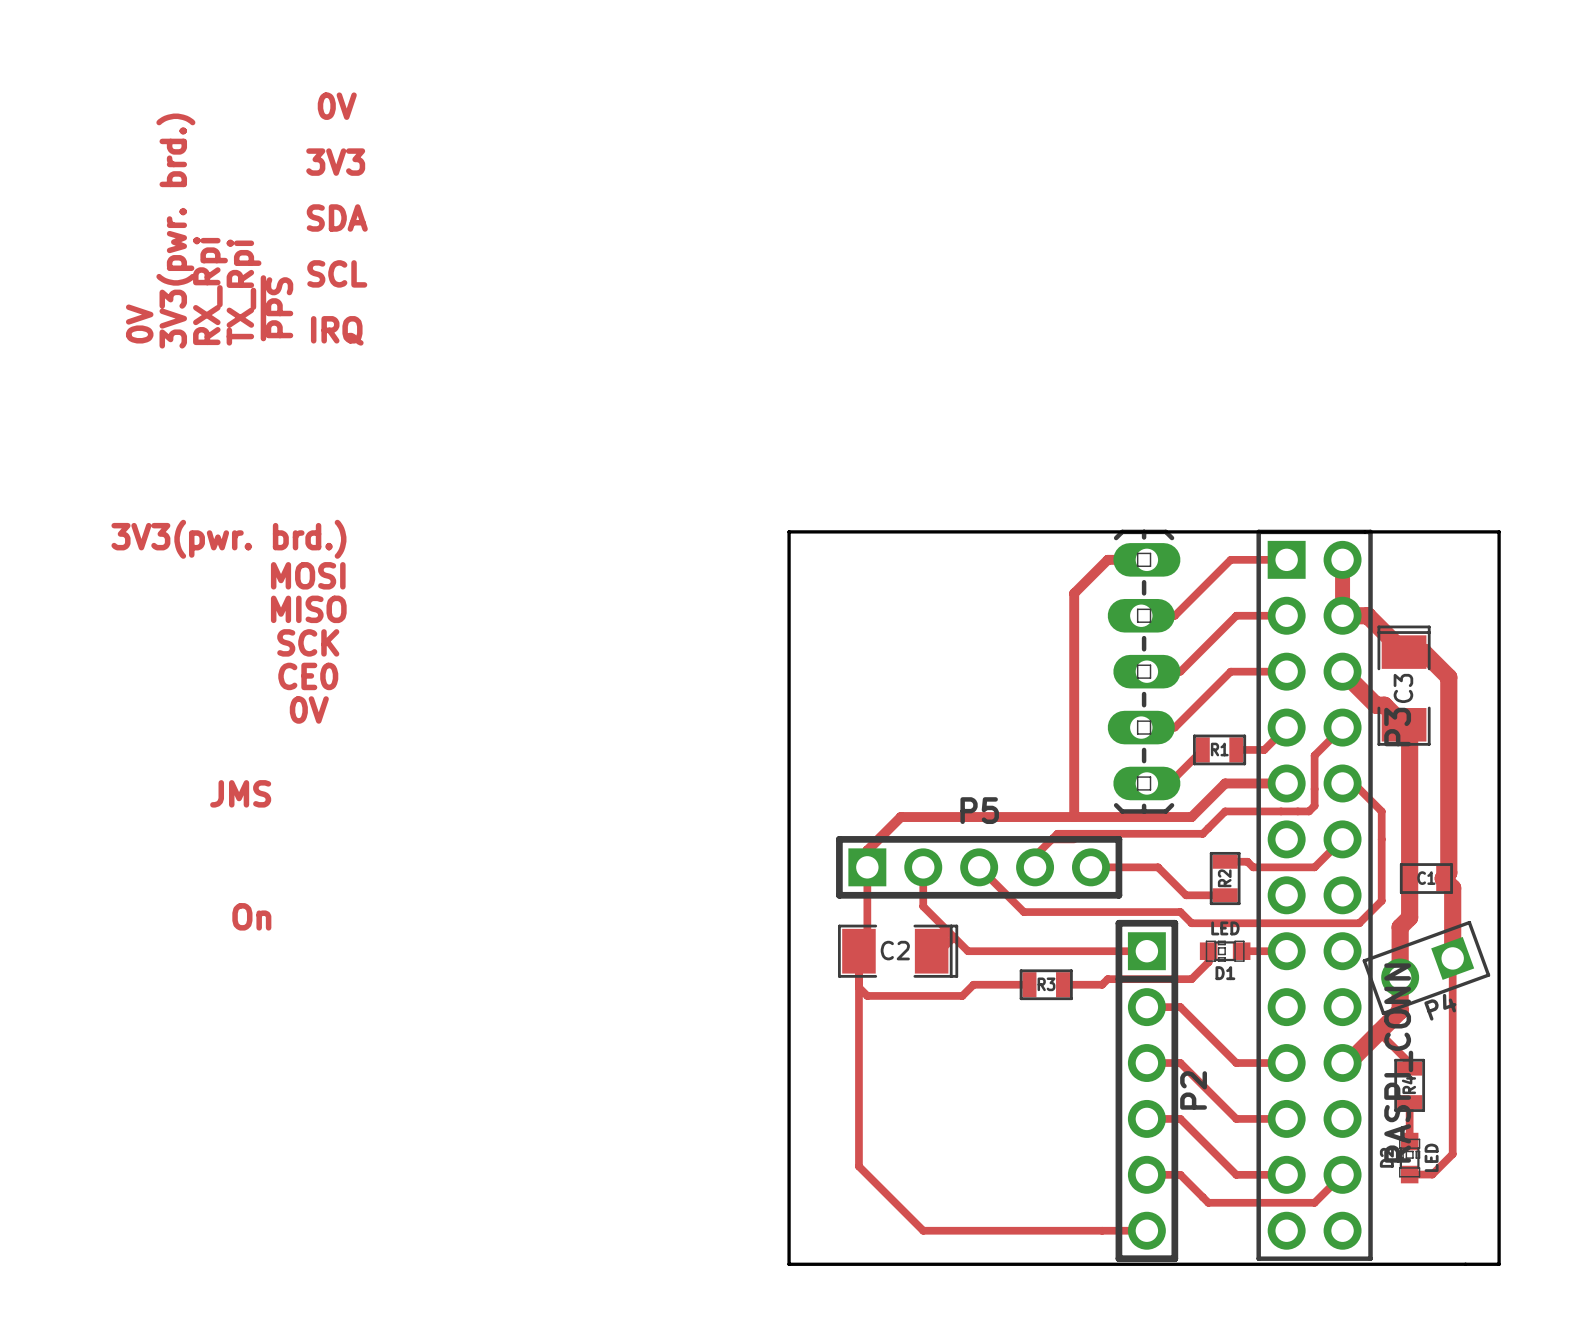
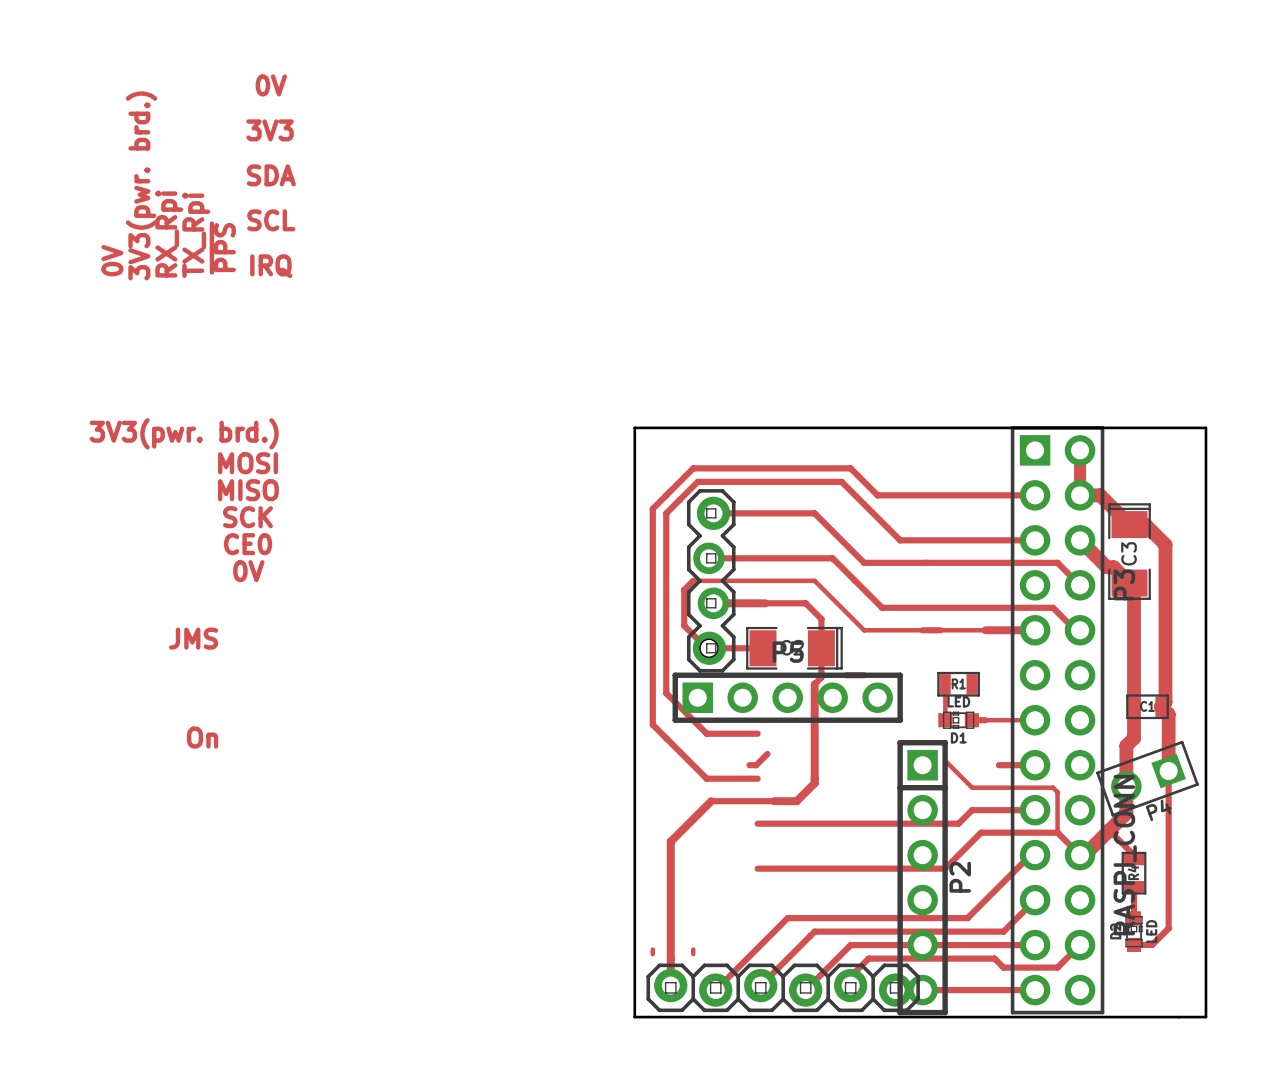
top track: (1146, 559) (1107, 559) (1074, 593) (1074, 817) -> none
top track: (1286, 559) (1230, 559) (1174, 615) -> none
top track: none -> (918, 495) (877, 495) (850, 468) (693, 468) (652, 508) (652, 724) (706, 778) (757, 778)
top track: (1236, 615) (1180, 671) -> (994, 495) (945, 495)
part: (1144, 671) -> none
top track: none -> (922, 540) (900, 540) (841, 481) (697, 481) (666, 513) (666, 693) (706, 733) (757, 733)
top track: (1230, 671) (1174, 727) (1141, 727) -> (990, 540) (949, 540)
part: none -> (711, 580)
top track: (1286, 727) (1264, 749) (1236, 749) -> none
top track: (1342, 727) (1314, 755) (1314, 805) (1309, 811) (1225, 811) (1202, 833) (1057, 833) (1035, 856) (1035, 867) -> (1080, 585) (1057, 562) (864, 562) (814, 513) (713, 513)
top track: (1202, 749) (1169, 783) -> (985, 630) (940, 630)
R1 position: (1219, 749) -> (958, 684)
top track: none -> (922, 630) (864, 630) (814, 580) (693, 580) (684, 589) (684, 625) (706, 648) (762, 648)
top track: (1225, 783) (1191, 817) (900, 817) (867, 850) (867, 942) (858, 951) (858, 1166) (923, 1230) (1113, 1230) -> none
top track: (1342, 783) (1353, 783) (1381, 811) (1381, 900) (1359, 923) (1191, 923) (1180, 912) (1023, 912) (979, 867) -> (1080, 630) (1075, 630) (1053, 607) (882, 607) (832, 558) (708, 558)
top track: (1342, 839) (1314, 867) (1253, 867) (1247, 861) (1225, 861) -> none
top track: none -> (945, 684) (945, 720)
top track: (923, 867) (923, 906) (967, 951) (1146, 951) -> none
top track: (1090, 867) (1158, 867) (1186, 895) (1208, 895) -> none
R2: (1225, 878) -> none
top track: none -> (985, 720) (1035, 720)
top track: none -> (945, 760) (972, 787) (1053, 787) (1057, 792) (1057, 832)
C2 position: (898, 951) -> (794, 648)
top track: (1208, 951) (1208, 962) (1191, 979) (1107, 979) (1102, 984) (1063, 984) -> none
D1 position: (1225, 951) -> (958, 720)
top track: (1029, 984) (973, 984) (962, 995) -> (713, 603) (805, 603) (821, 619) (821, 677) (814, 684) (814, 783) (796, 801) (774, 801)
R3: (1046, 984) -> none
top track: (858, 987) (867, 995) (884, 995) -> (670, 985) (670, 841) (711, 801)
top track: (1146, 1007) (1180, 1007) (1236, 1063) (1281, 1063) -> (715, 990) (787, 918) (967, 918) (1030, 855)
top track: none -> (1035, 810) (972, 810) (958, 823) (757, 823)
top track: none -> (1057, 832) (1080, 855)
top track: none -> (1057, 832) (981, 832) (945, 868) (757, 868)
top track: (1146, 1063) (1180, 1063) (1236, 1118) (1286, 1118) -> (760, 985) (814, 931) (1003, 931) (1035, 900)
top track: (1146, 1118) (1180, 1118) (1236, 1174) -> none
top track: none -> (922, 945) (850, 945) (805, 990)
top track: (1180, 1174) (1208, 1202) (1247, 1202) -> (949, 945) (994, 945)
top track: none -> (652, 949) (652, 954)
top track: none -> (693, 949) (693, 954)
top track: none -> (1003, 967) (994, 958) (868, 958) (850, 976) (850, 985)
part: none -> (783, 987)
top track: none -> (922, 990) (1035, 990)

